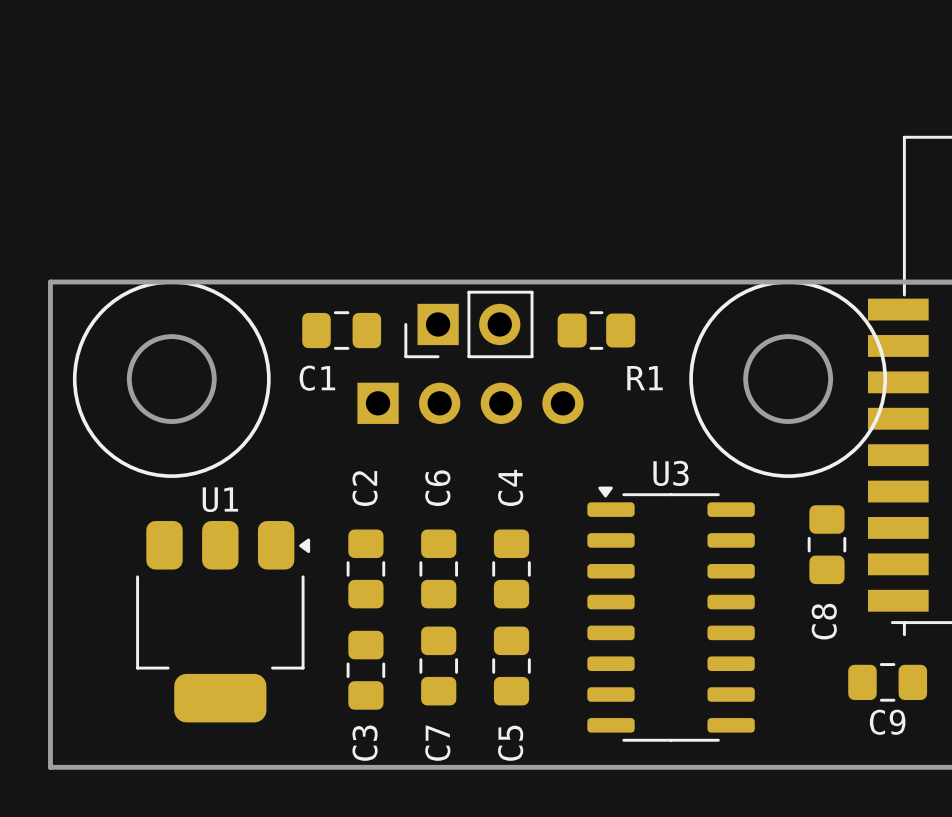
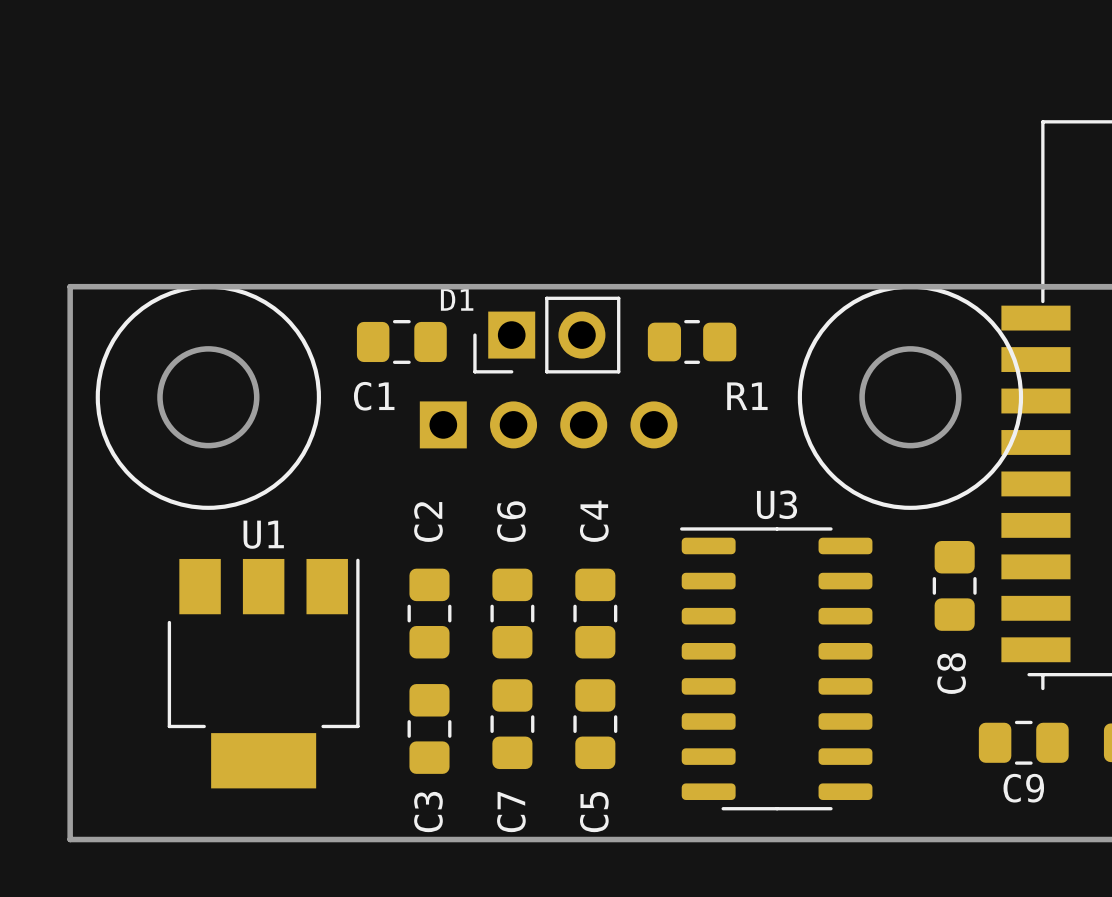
D1 name: none -> D1 (457, 299)
U3 footprint: [587, 486, 755, 742] -> [680, 527, 873, 811]
U1 footprint: [136, 521, 311, 723] -> [167, 558, 360, 789]

